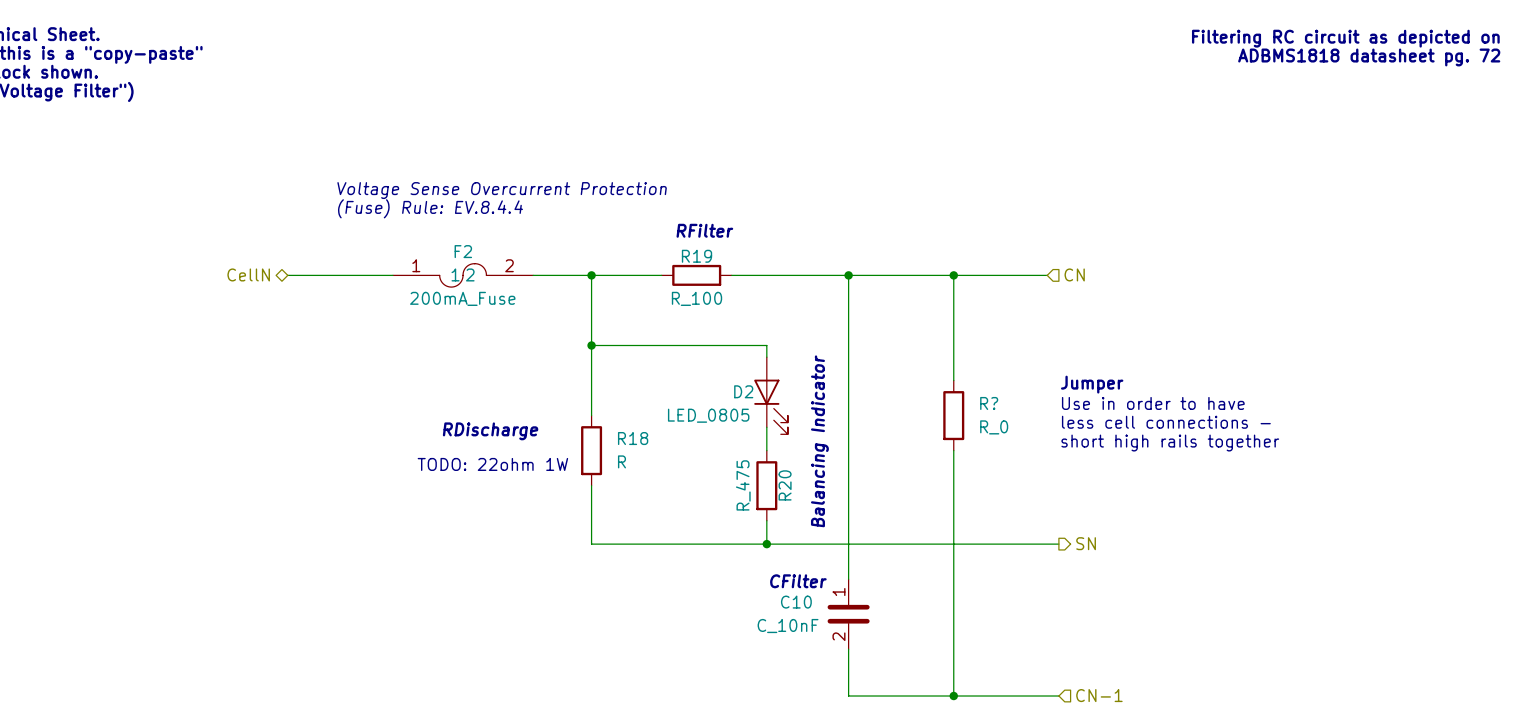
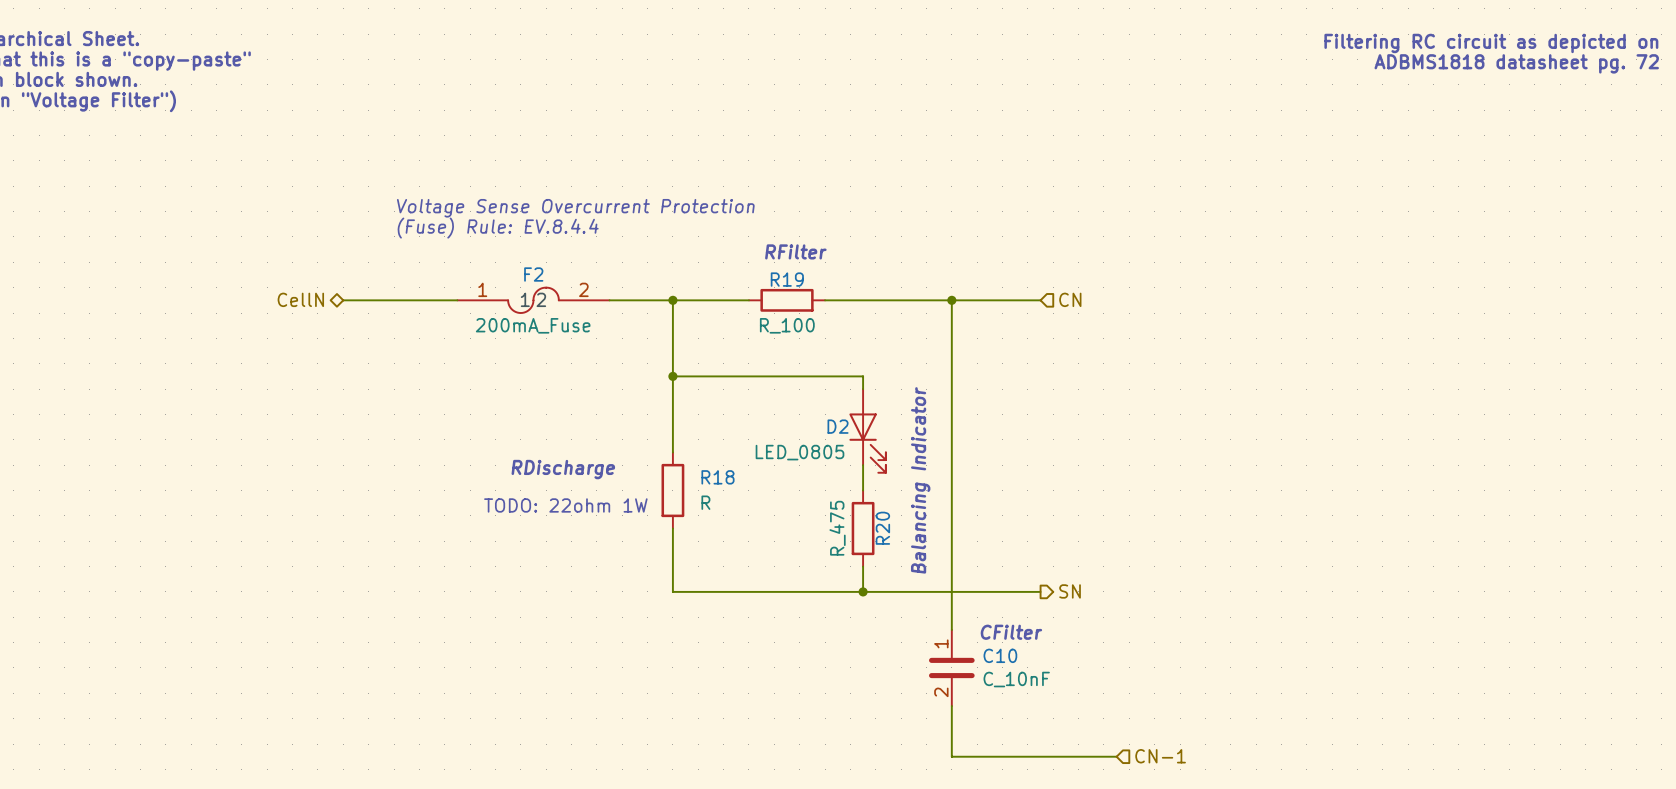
hierarchical label position: CN (1074, 274) -> CN (1070, 299)
wire: (930, 275) (1047, 275) -> none
wire: (953, 275) (953, 380) -> none
junction: (953, 275) -> none
text: Jumper (1092, 384) -> none
text: Use in order to have (1153, 403) -> none
R?: R_0 (953, 415) -> none
text: less cell connections - (1166, 422) -> none
text: short high rails together (1170, 443) -> none
wire: (953, 450) (953, 696) -> none
hierarchical label position: SN (1086, 543) -> SN (1070, 591)
wire: (930, 544) (1058, 544) -> none
text position: CFilter (798, 581) -> CFilter (1011, 632)
C10 name position: C10 (796, 602) -> C10 (1000, 655)
C10 value position: C_10nF (788, 626) -> C_10nF (1016, 679)
hierarchical label position: CN-1 (1099, 695) -> CN-1 (1160, 756)
junction: (953, 696) -> none
wire: (1000, 696) (1058, 696) -> none

